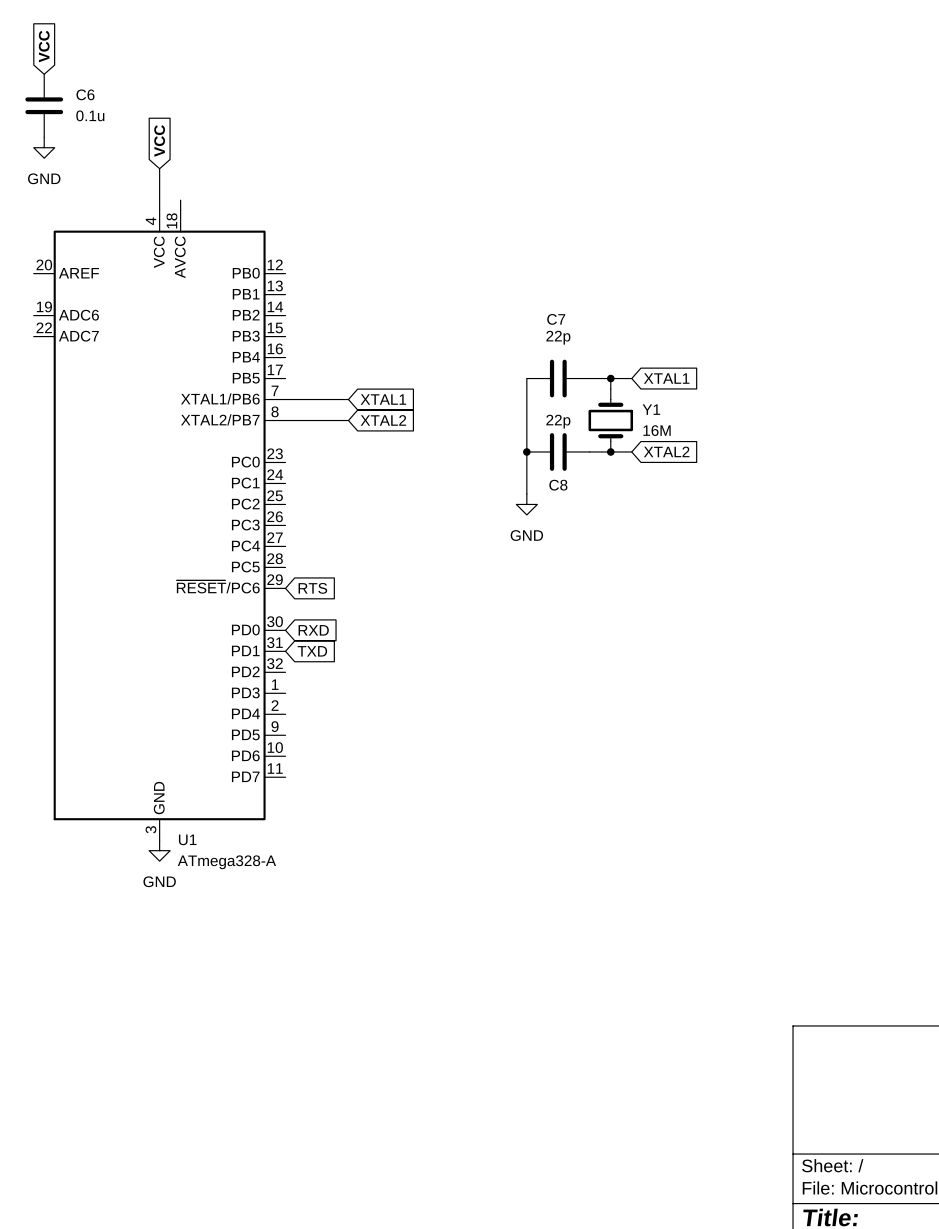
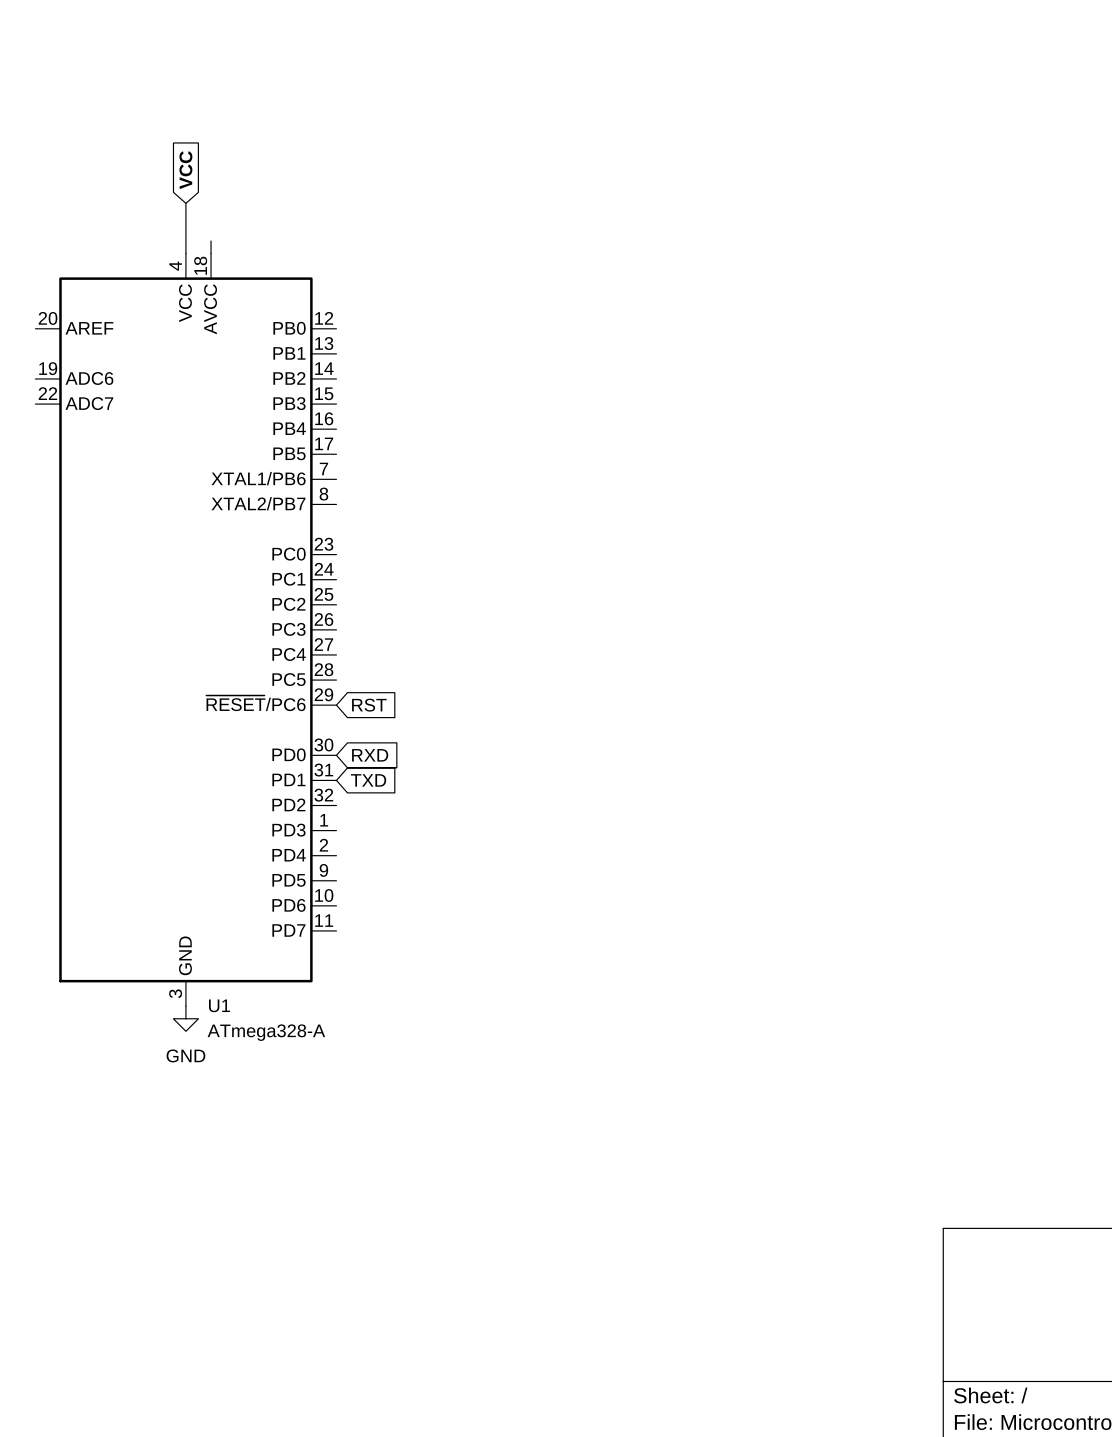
global label: VCC (44, 46) -> none
C6: 0.1u (44, 105) -> none
power symbol: GND (44, 147) -> none
wire: (526, 378) (526, 493) -> none
C7: 22p (558, 378) -> none
wire: (589, 378) (631, 378) -> none
wire: (610, 378) (610, 389) -> none
junction: (610, 378) -> none
global label: XTAL1 (666, 378) -> none
wire: (285, 399) (348, 399) -> none
global label: XTAL1 (383, 399) -> none
wire: (285, 420) (348, 420) -> none
global label: XTAL2 (383, 420) -> none
Y1: 16M (610, 420) -> none
junction: (526, 451) -> none
C8: 22p (558, 451) -> none
wire: (589, 451) (631, 451) -> none
junction: (610, 451) -> none
global label: XTAL2 (666, 451) -> none
power symbol: GND (526, 504) -> none
global label: RTS (312, 588) -> RST (369, 705)

